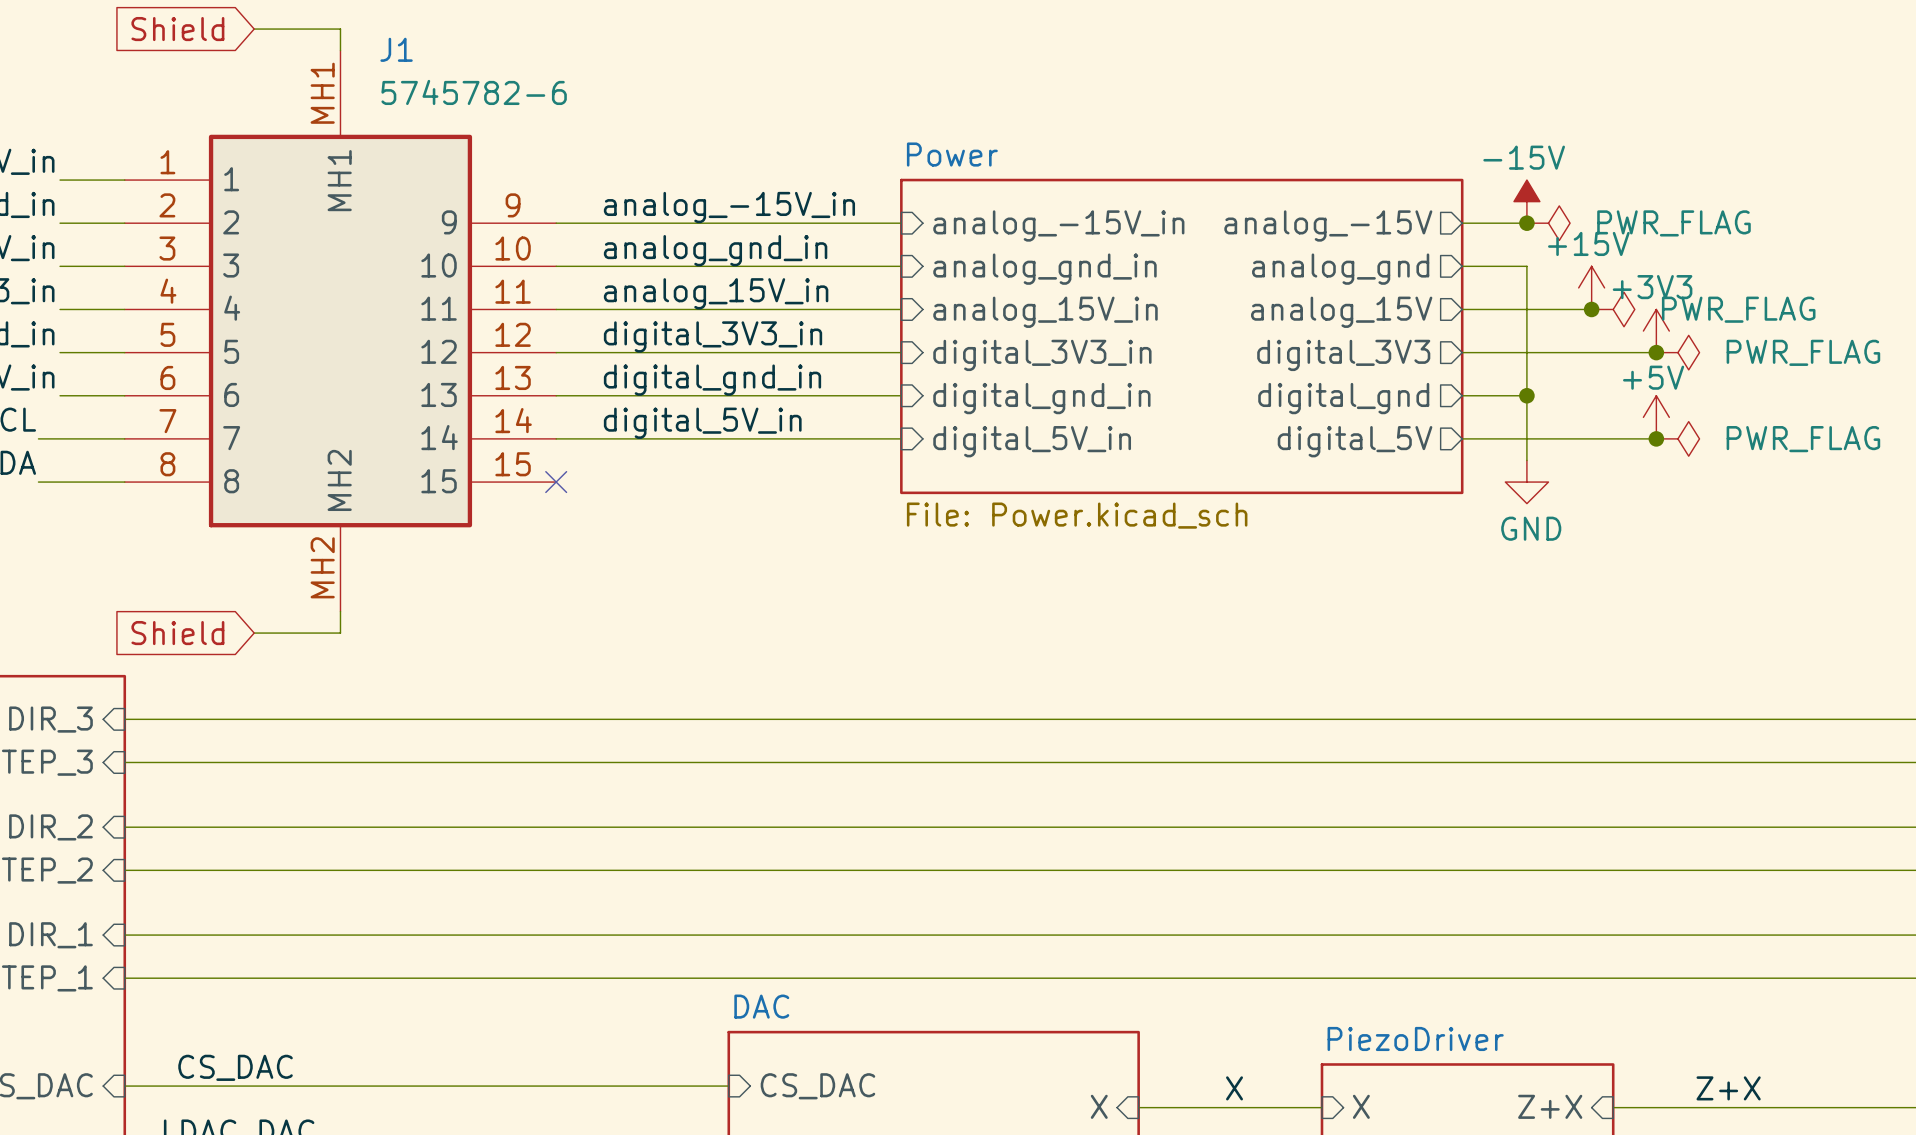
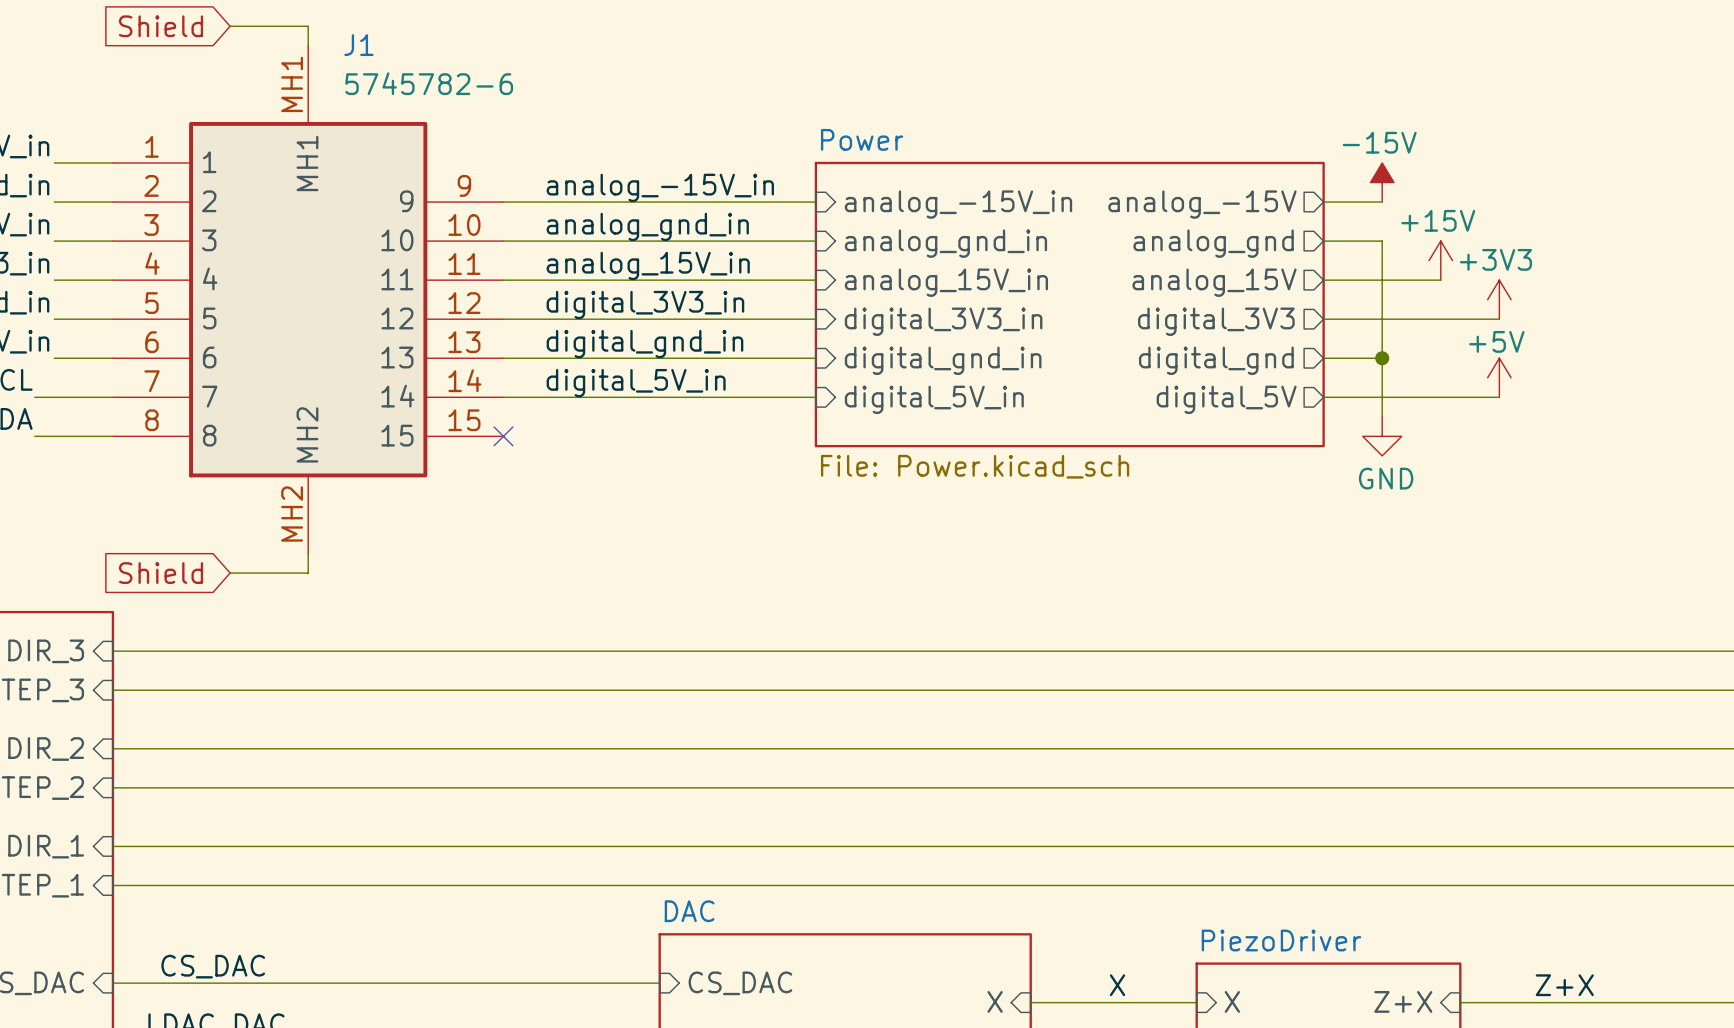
junction: (1526, 223) -> none
power symbol: PWR_FLAG (1548, 223) -> none
junction: (1591, 309) -> none
power symbol: PWR_FLAG (1613, 309) -> none
junction: (1656, 352) -> none
power symbol: PWR_FLAG (1677, 352) -> none
junction: (1656, 438) -> none
power symbol: PWR_FLAG (1677, 438) -> none

